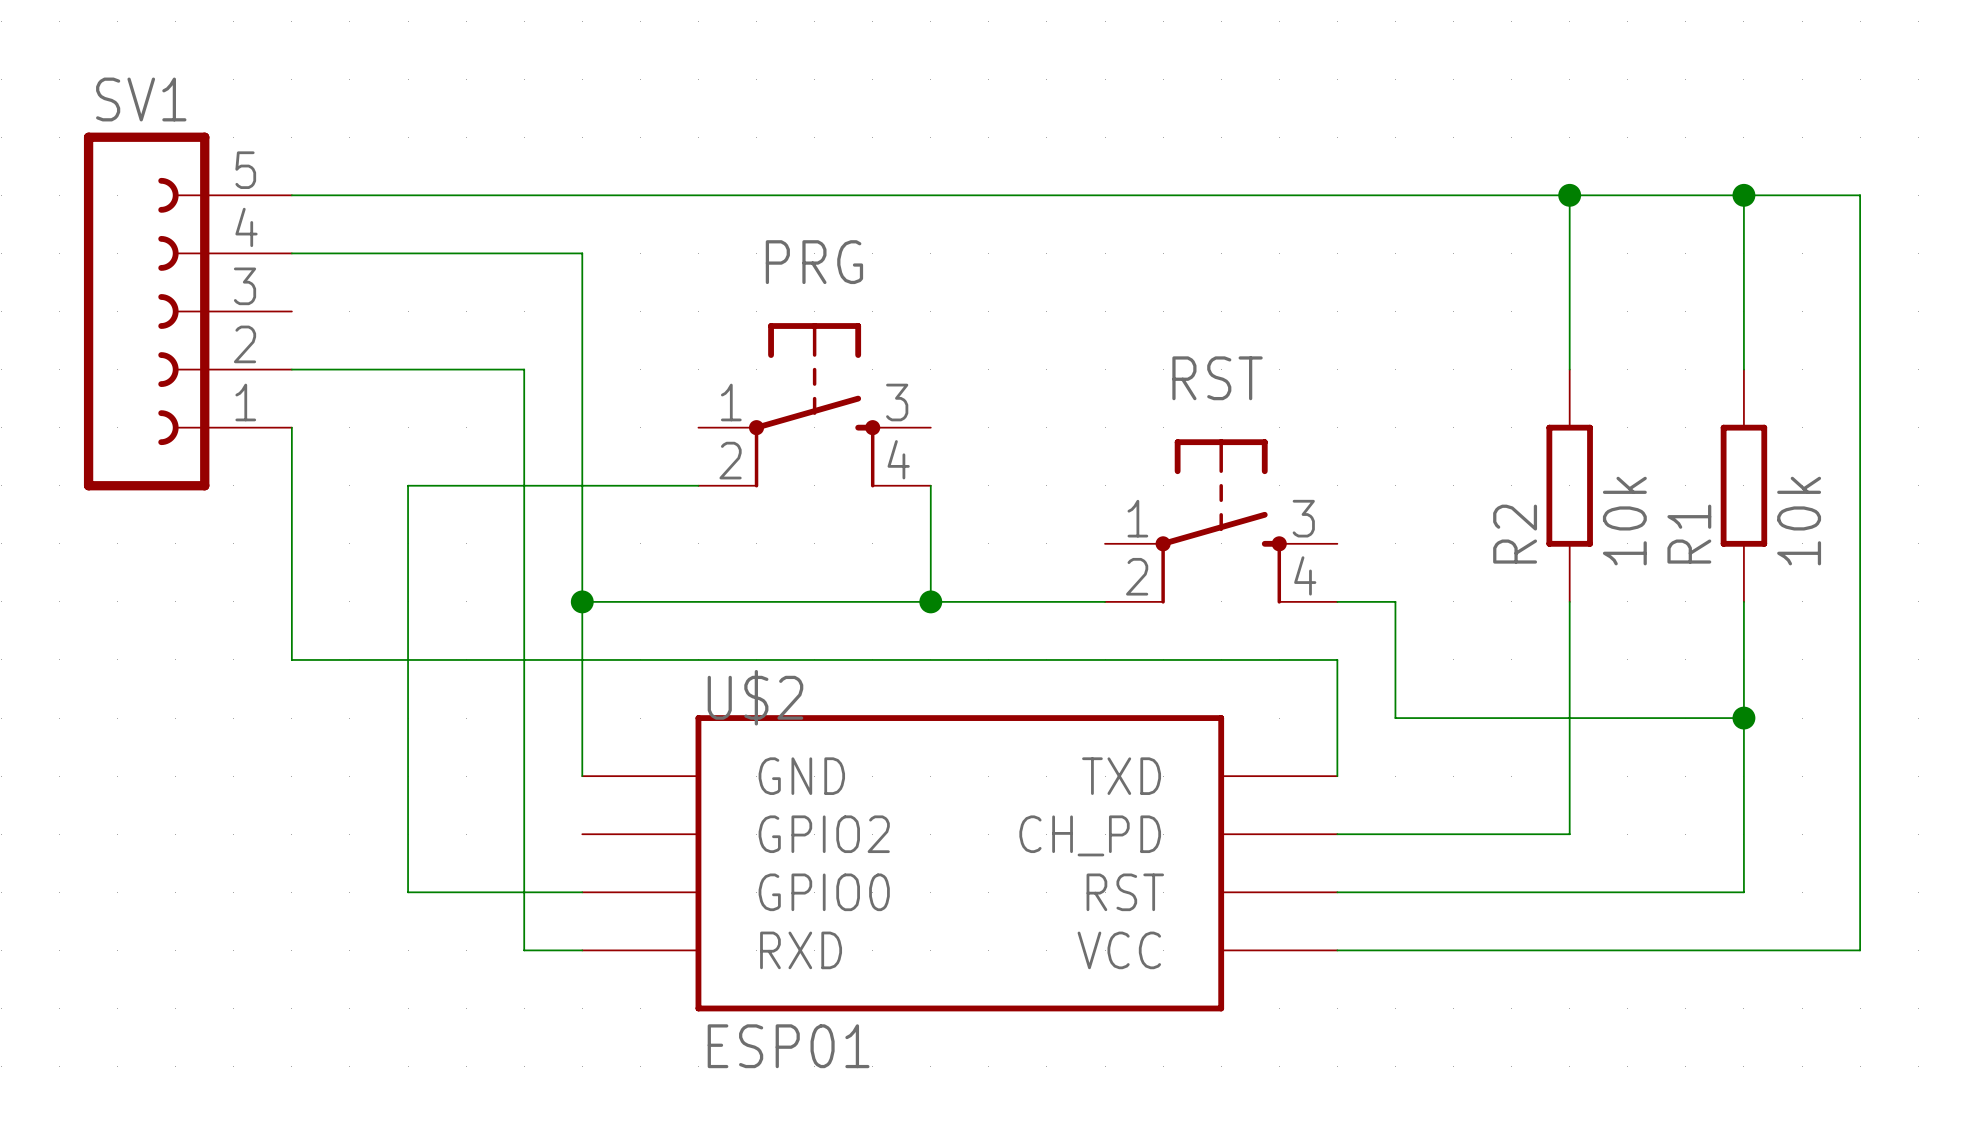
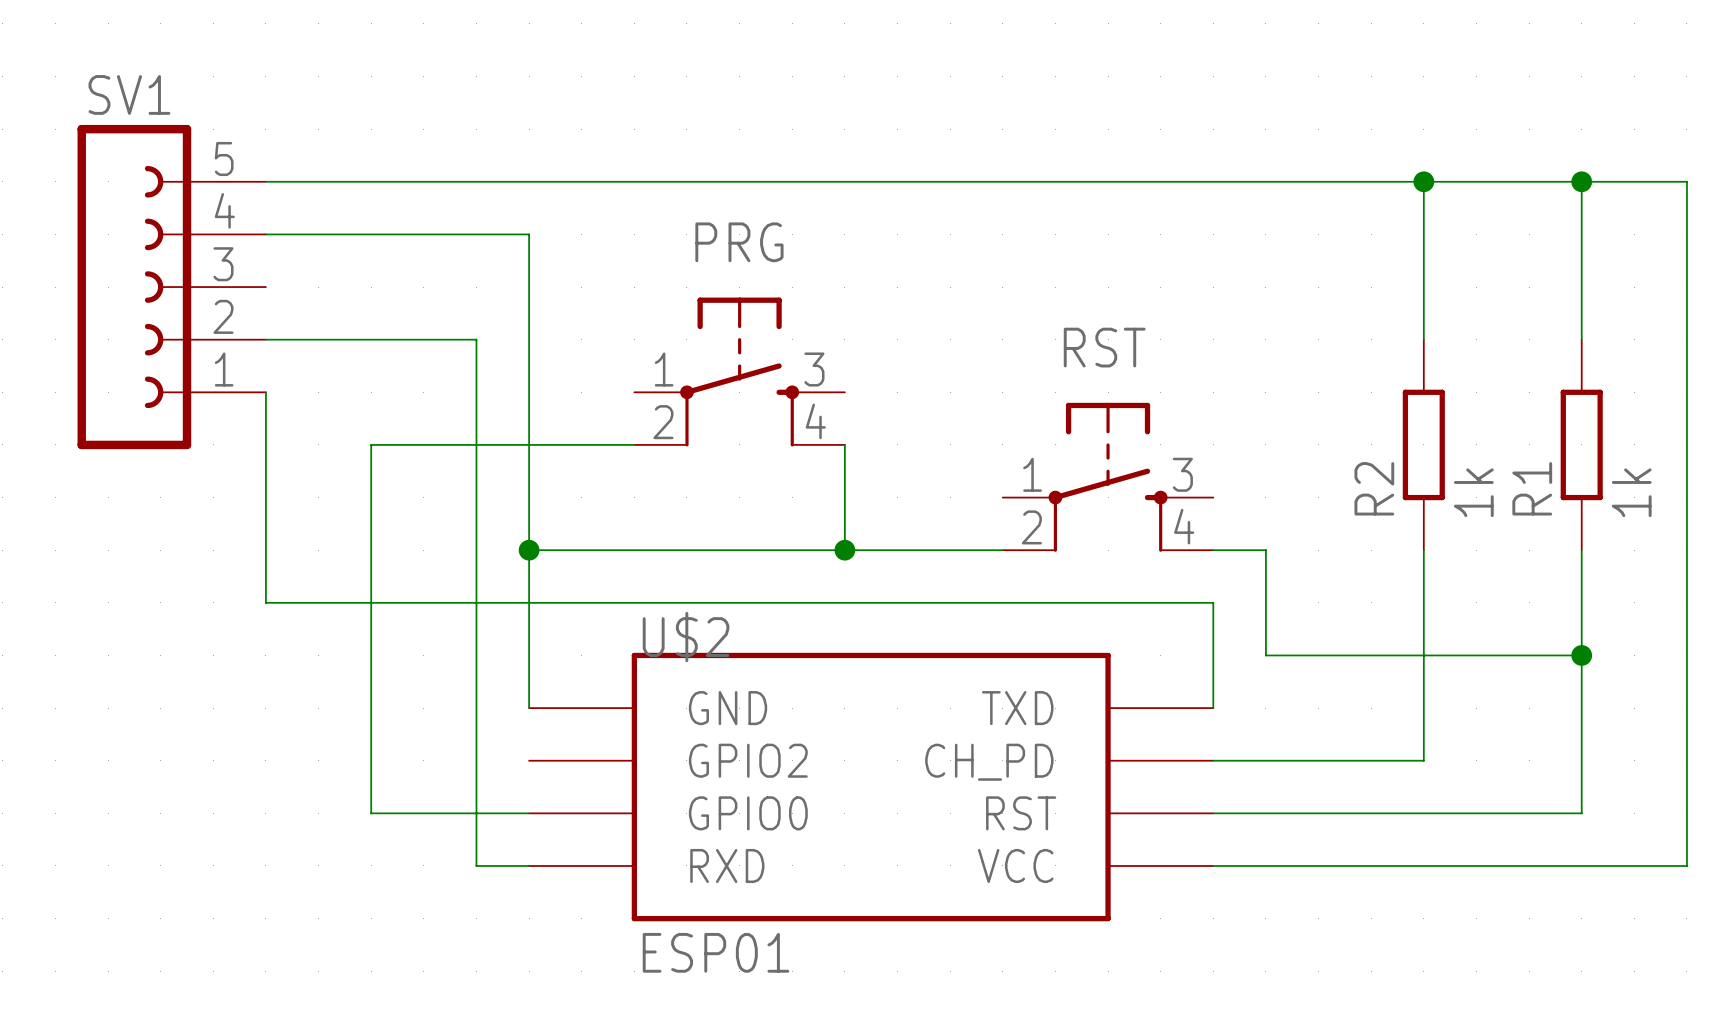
R2 value: 10k (1624, 521) -> 1k (1473, 492)
R1 value: 10k (1799, 521) -> 1k (1631, 492)

